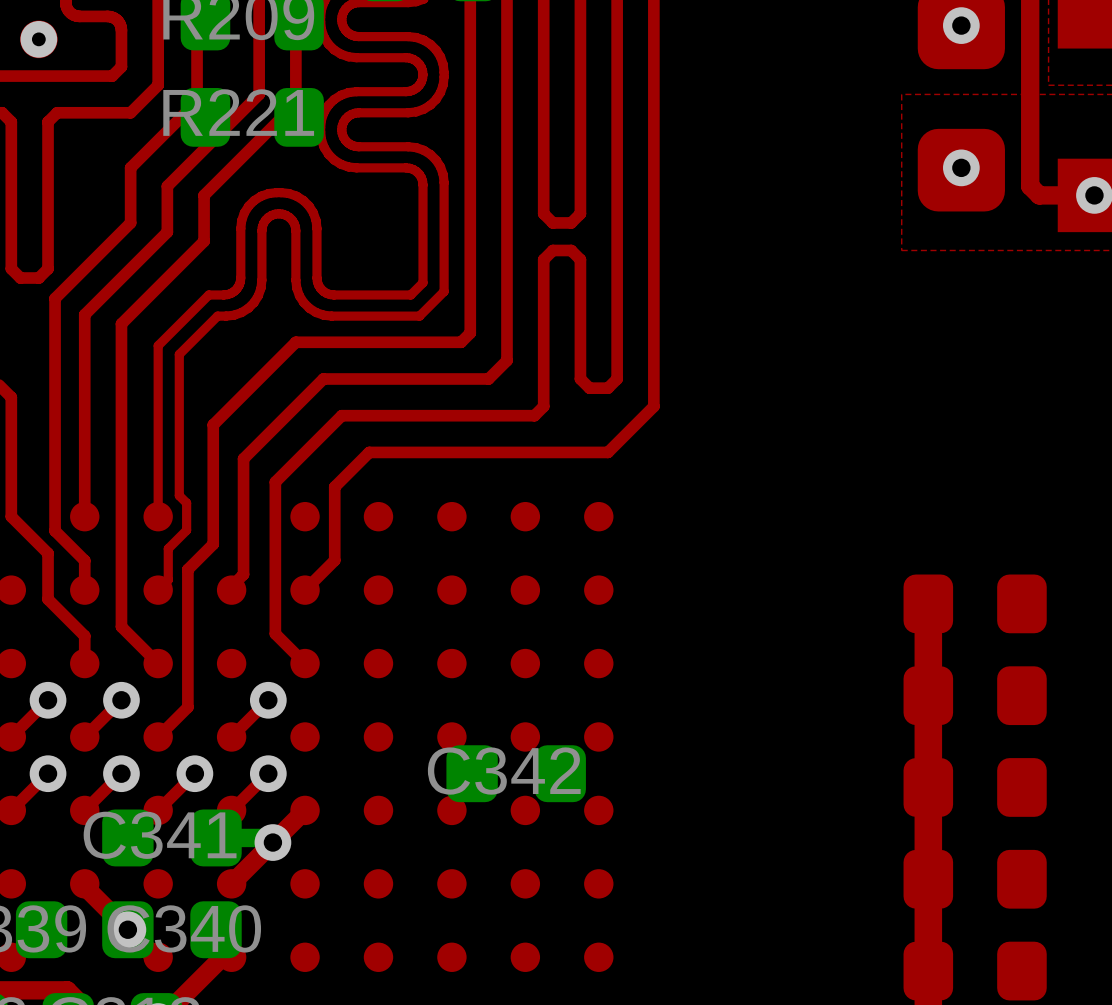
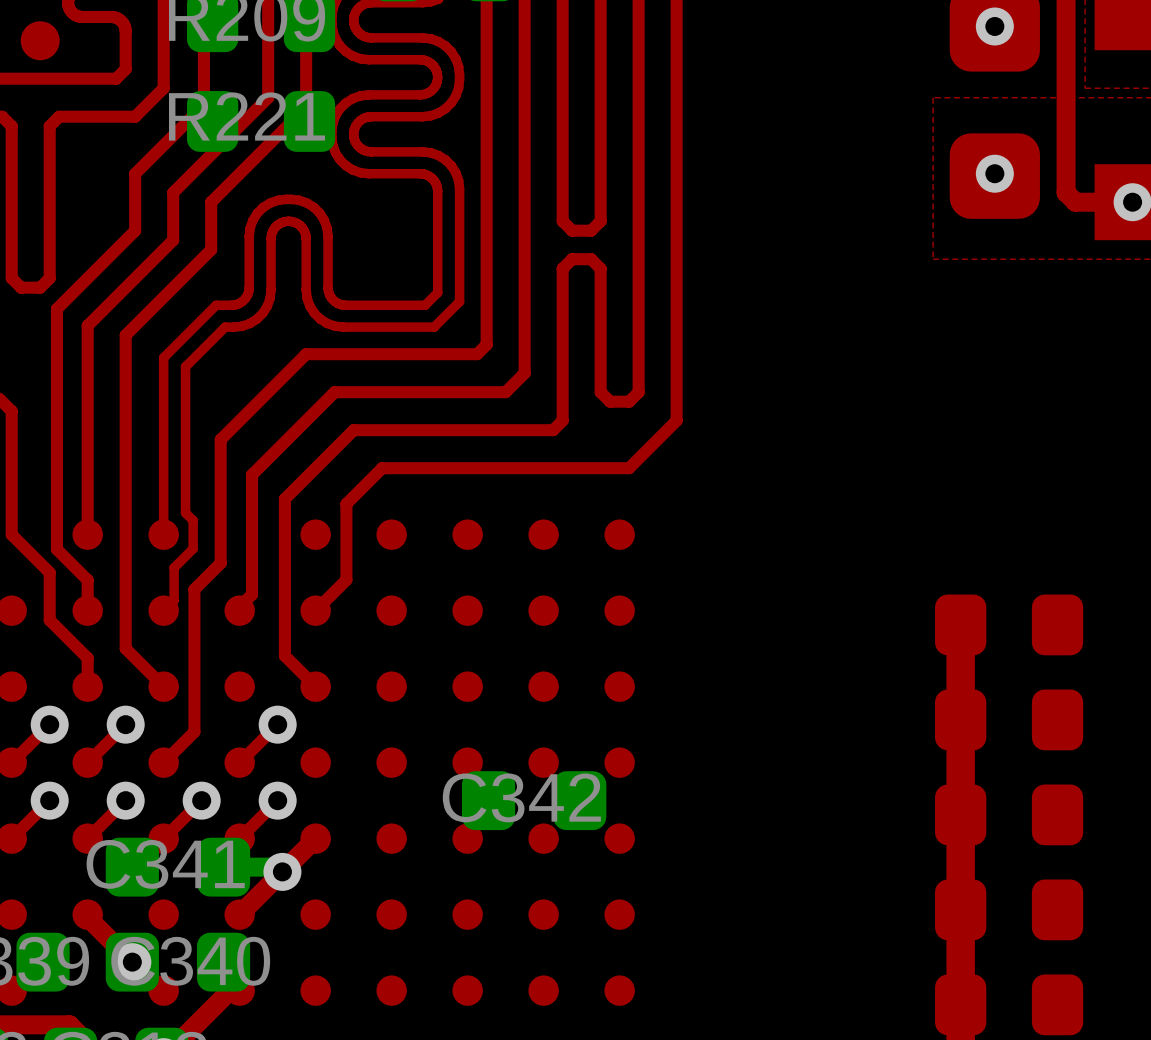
via: (38, 39) -> none

